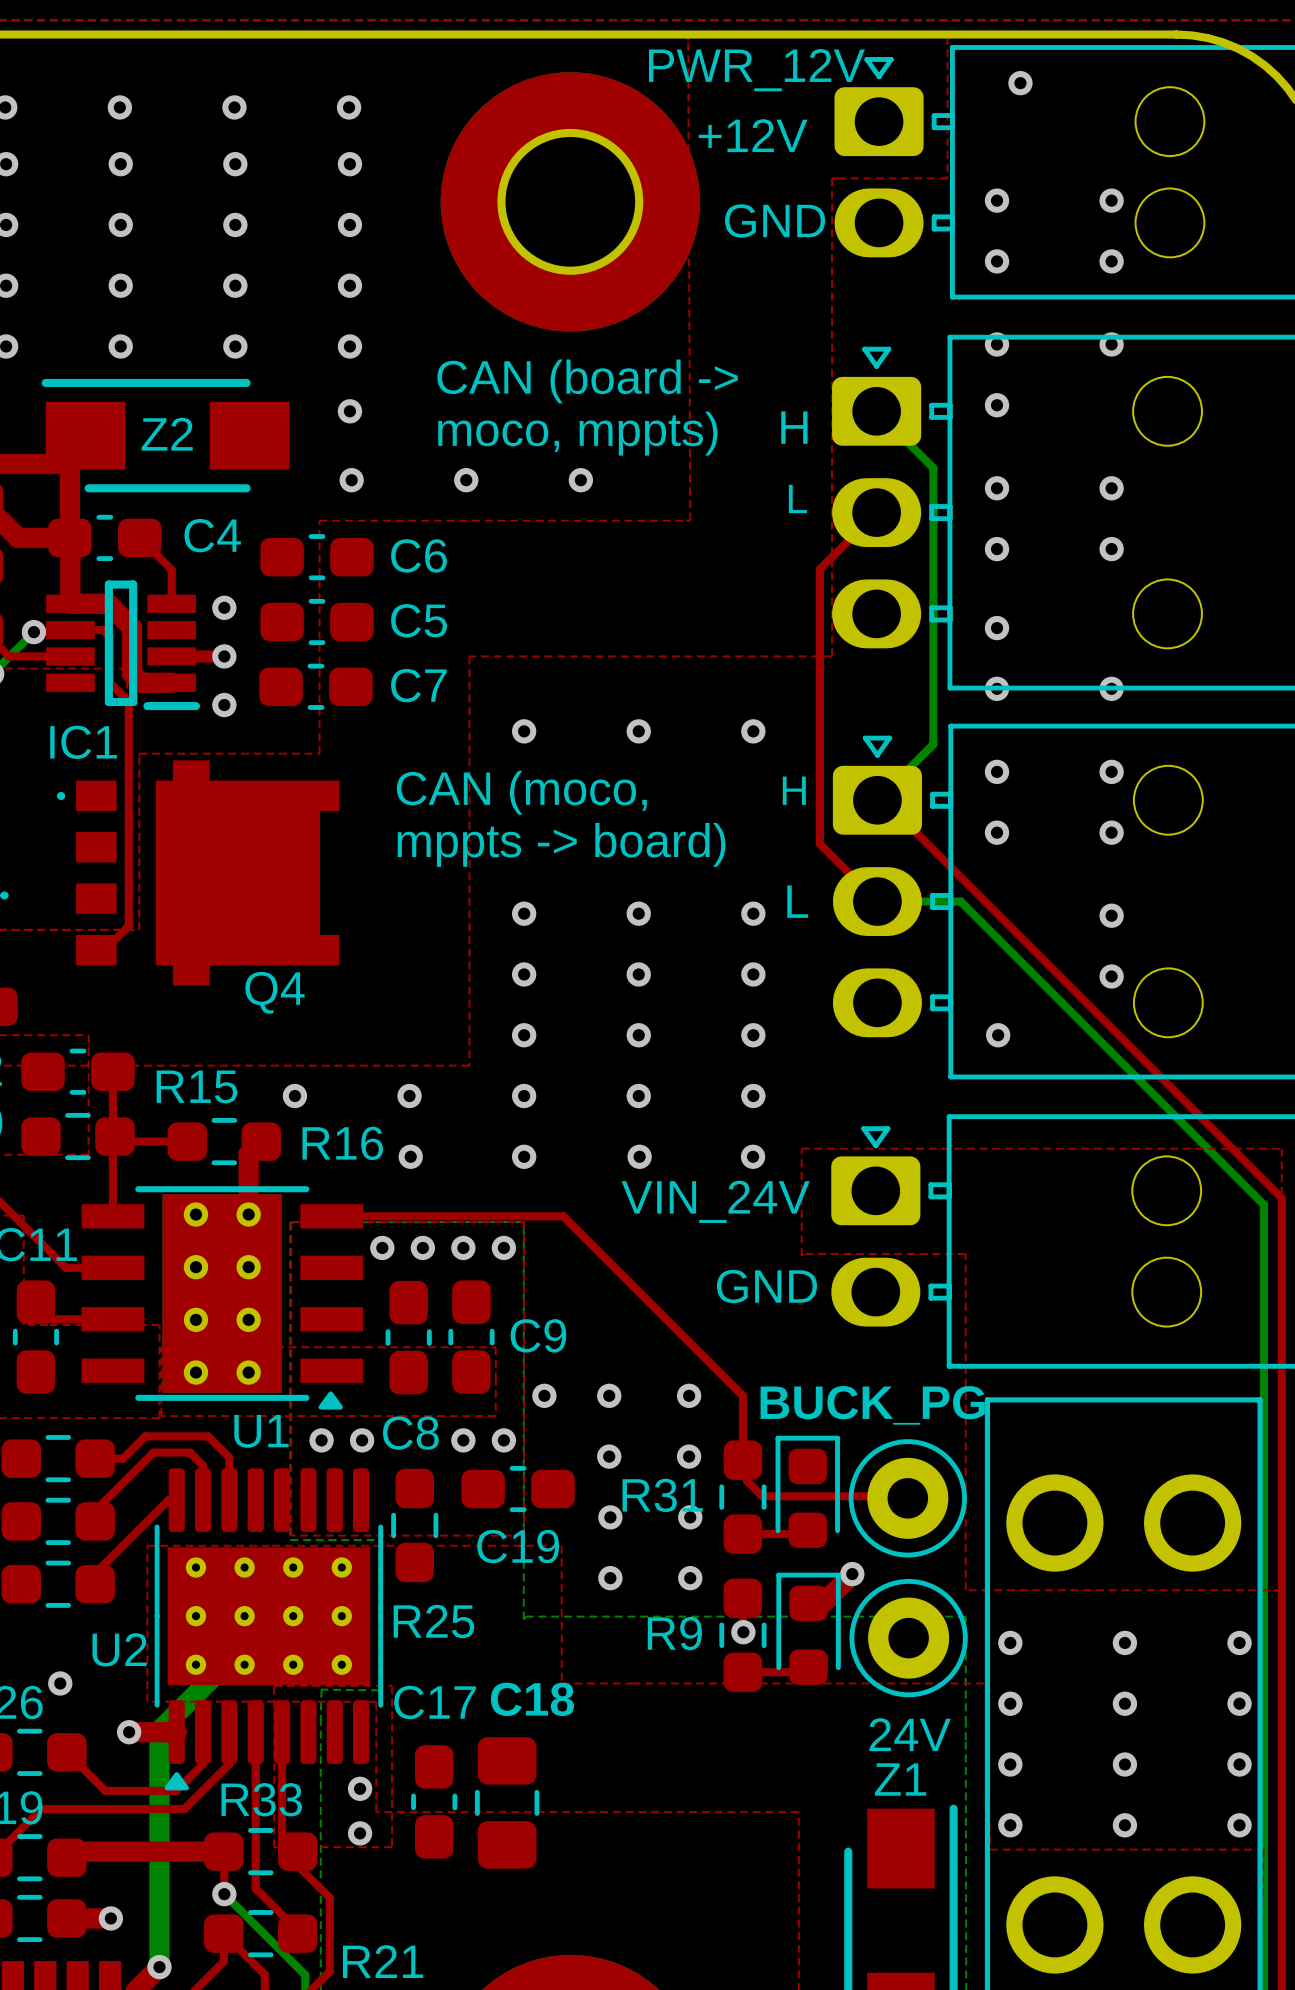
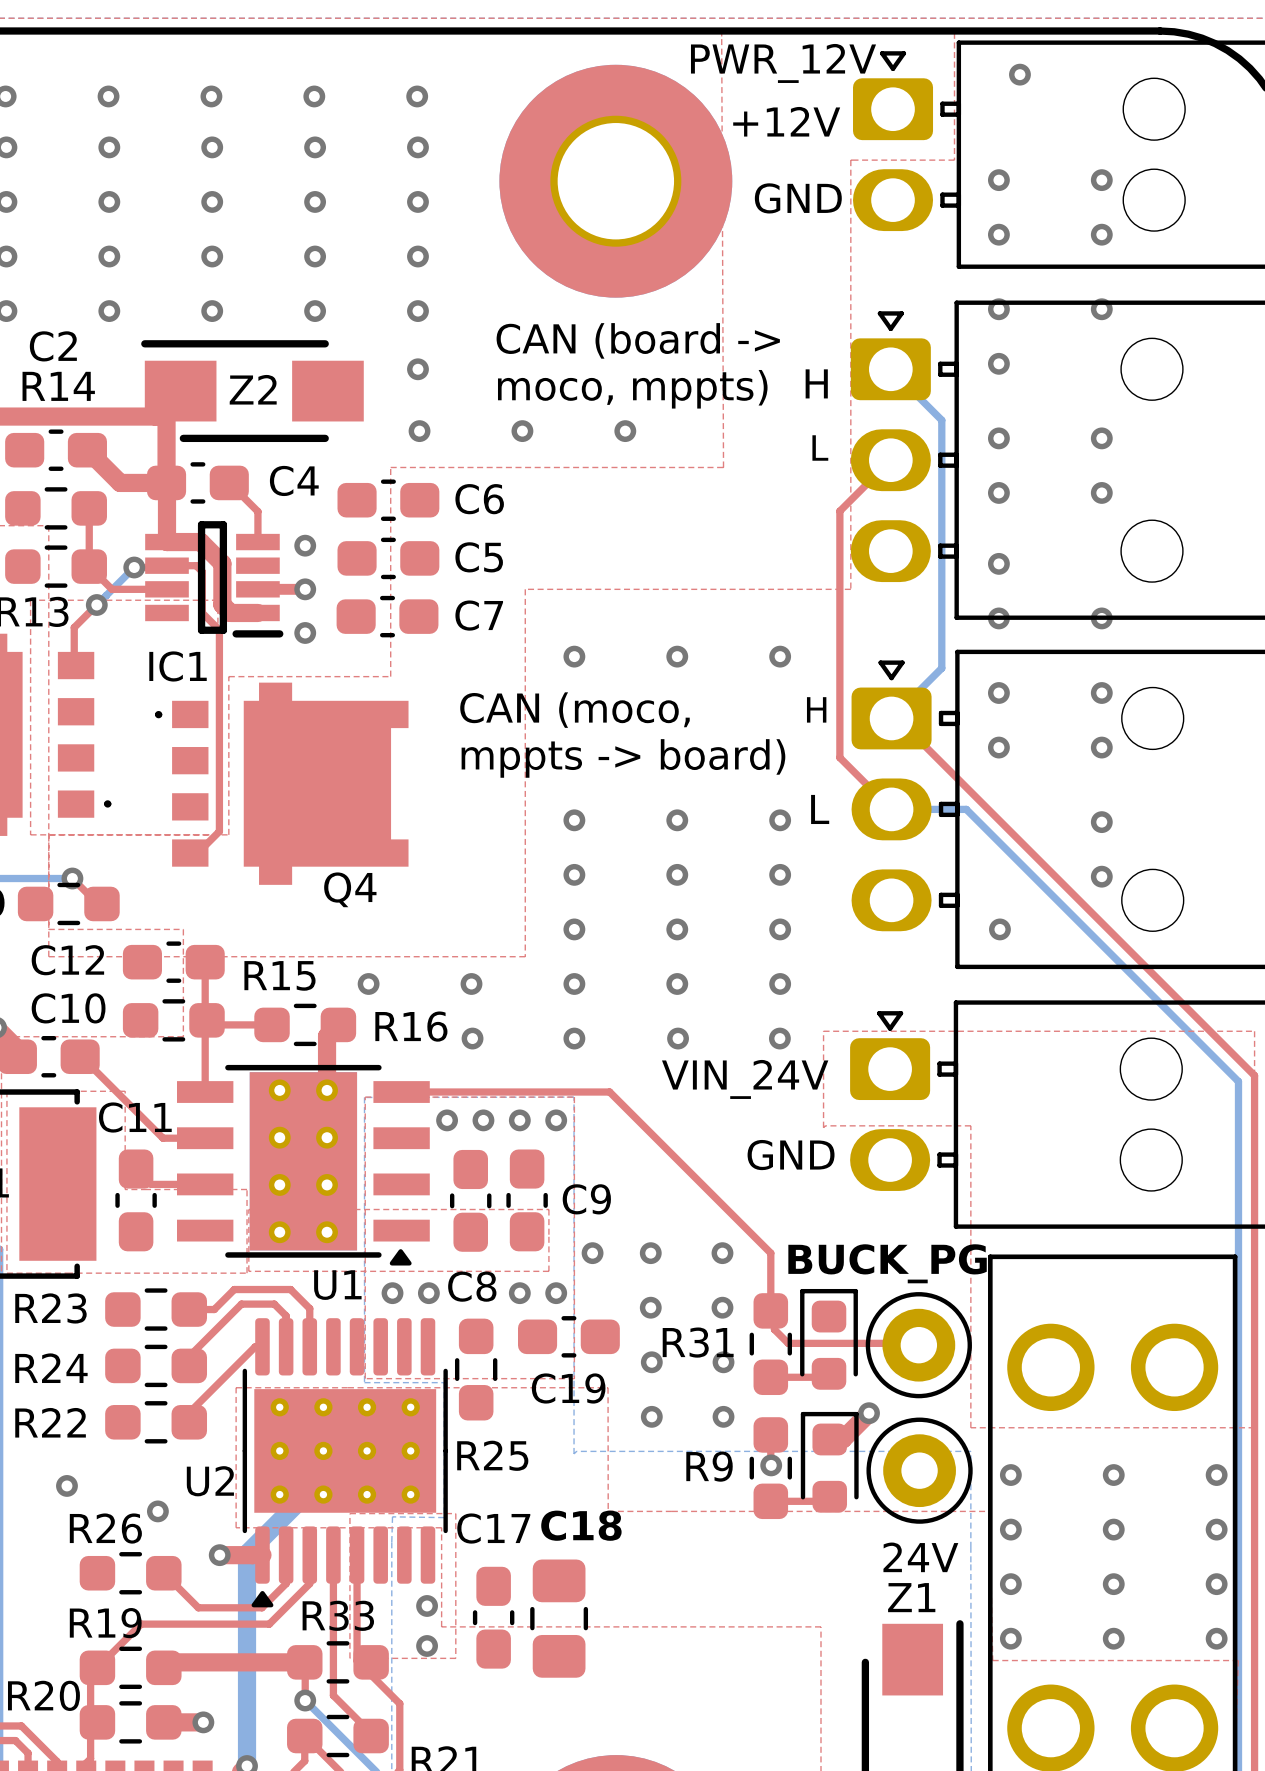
24V name: none -> 24V (920, 1557)
text: 24V (910, 1734) -> none

